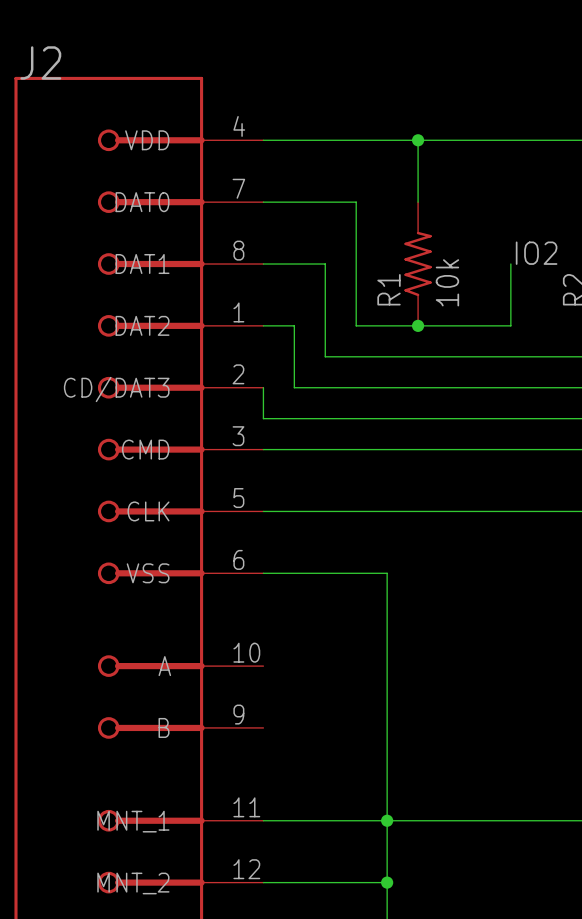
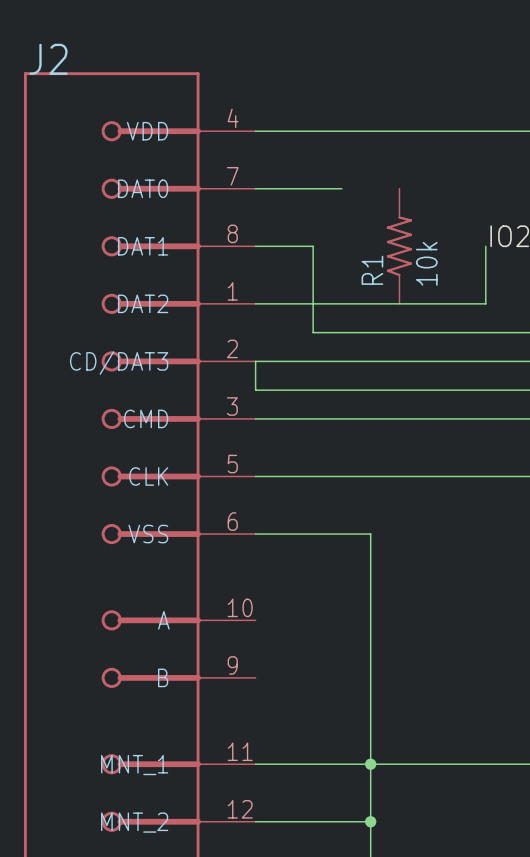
wire: (418, 140) (418, 202) -> none
junction: (418, 140) -> none
wire: (356, 202) (356, 325) -> (284, 303) (341, 303)
wire: (294, 325) (294, 387) -> (255, 361) (284, 361)
junction: (418, 325) -> none

